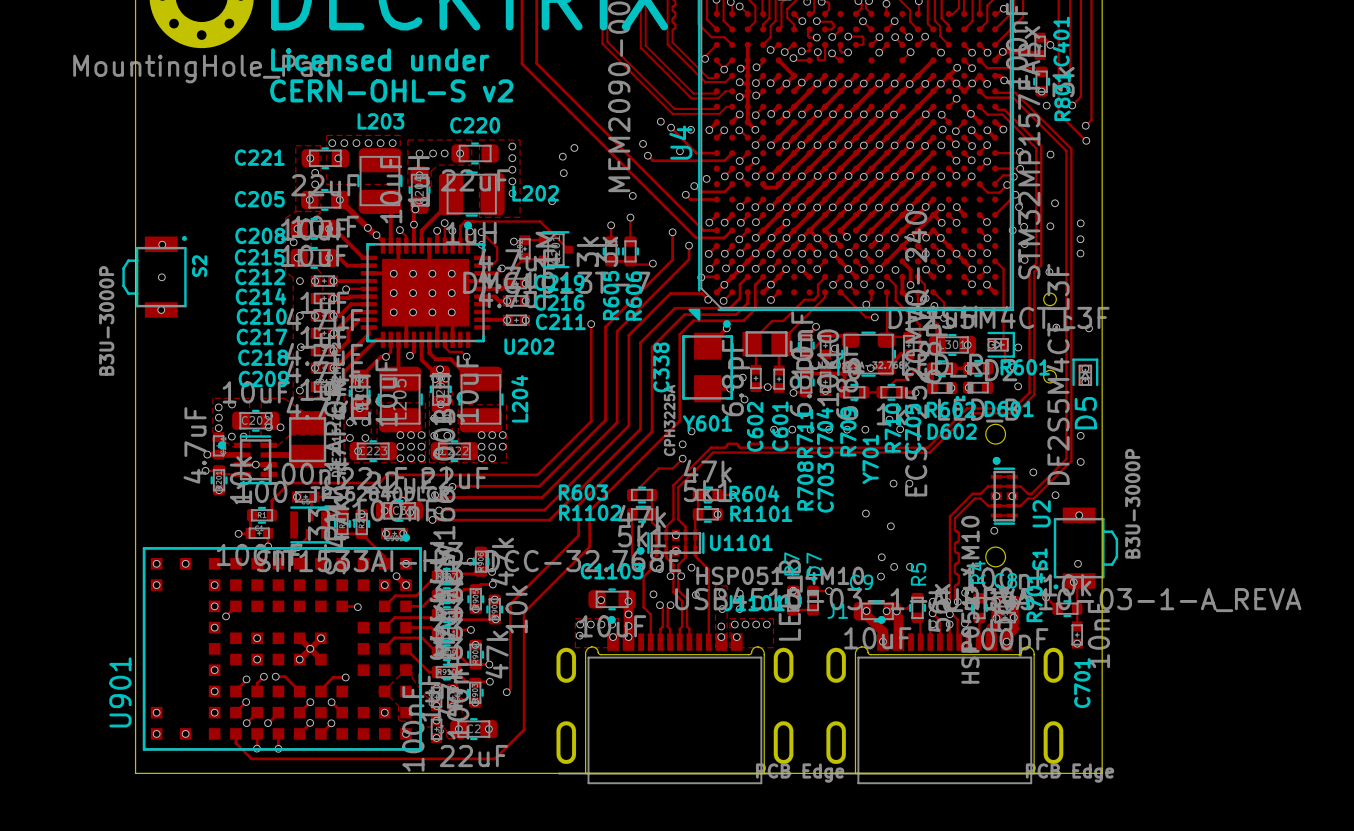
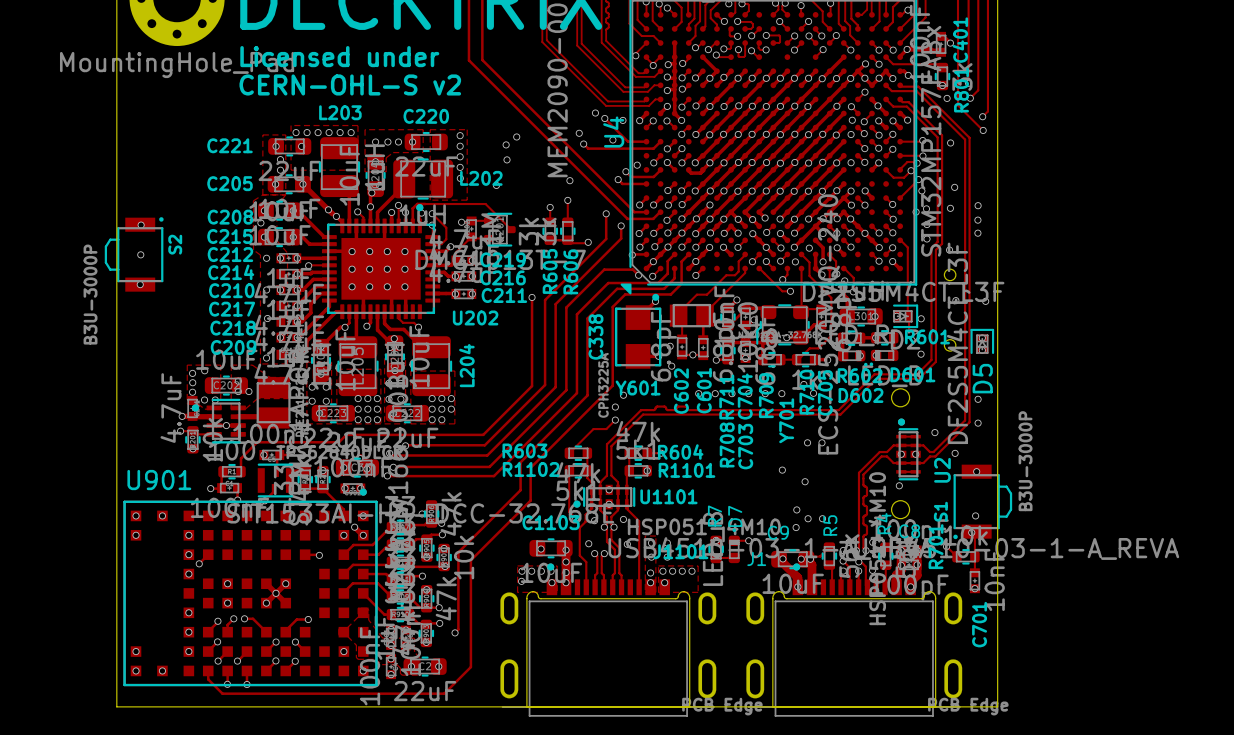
U901 name rotation: 0° (120, 692) -> 90° clockwise (159, 480)
U901 name position: U901 (120, 692) -> U901 (159, 480)

